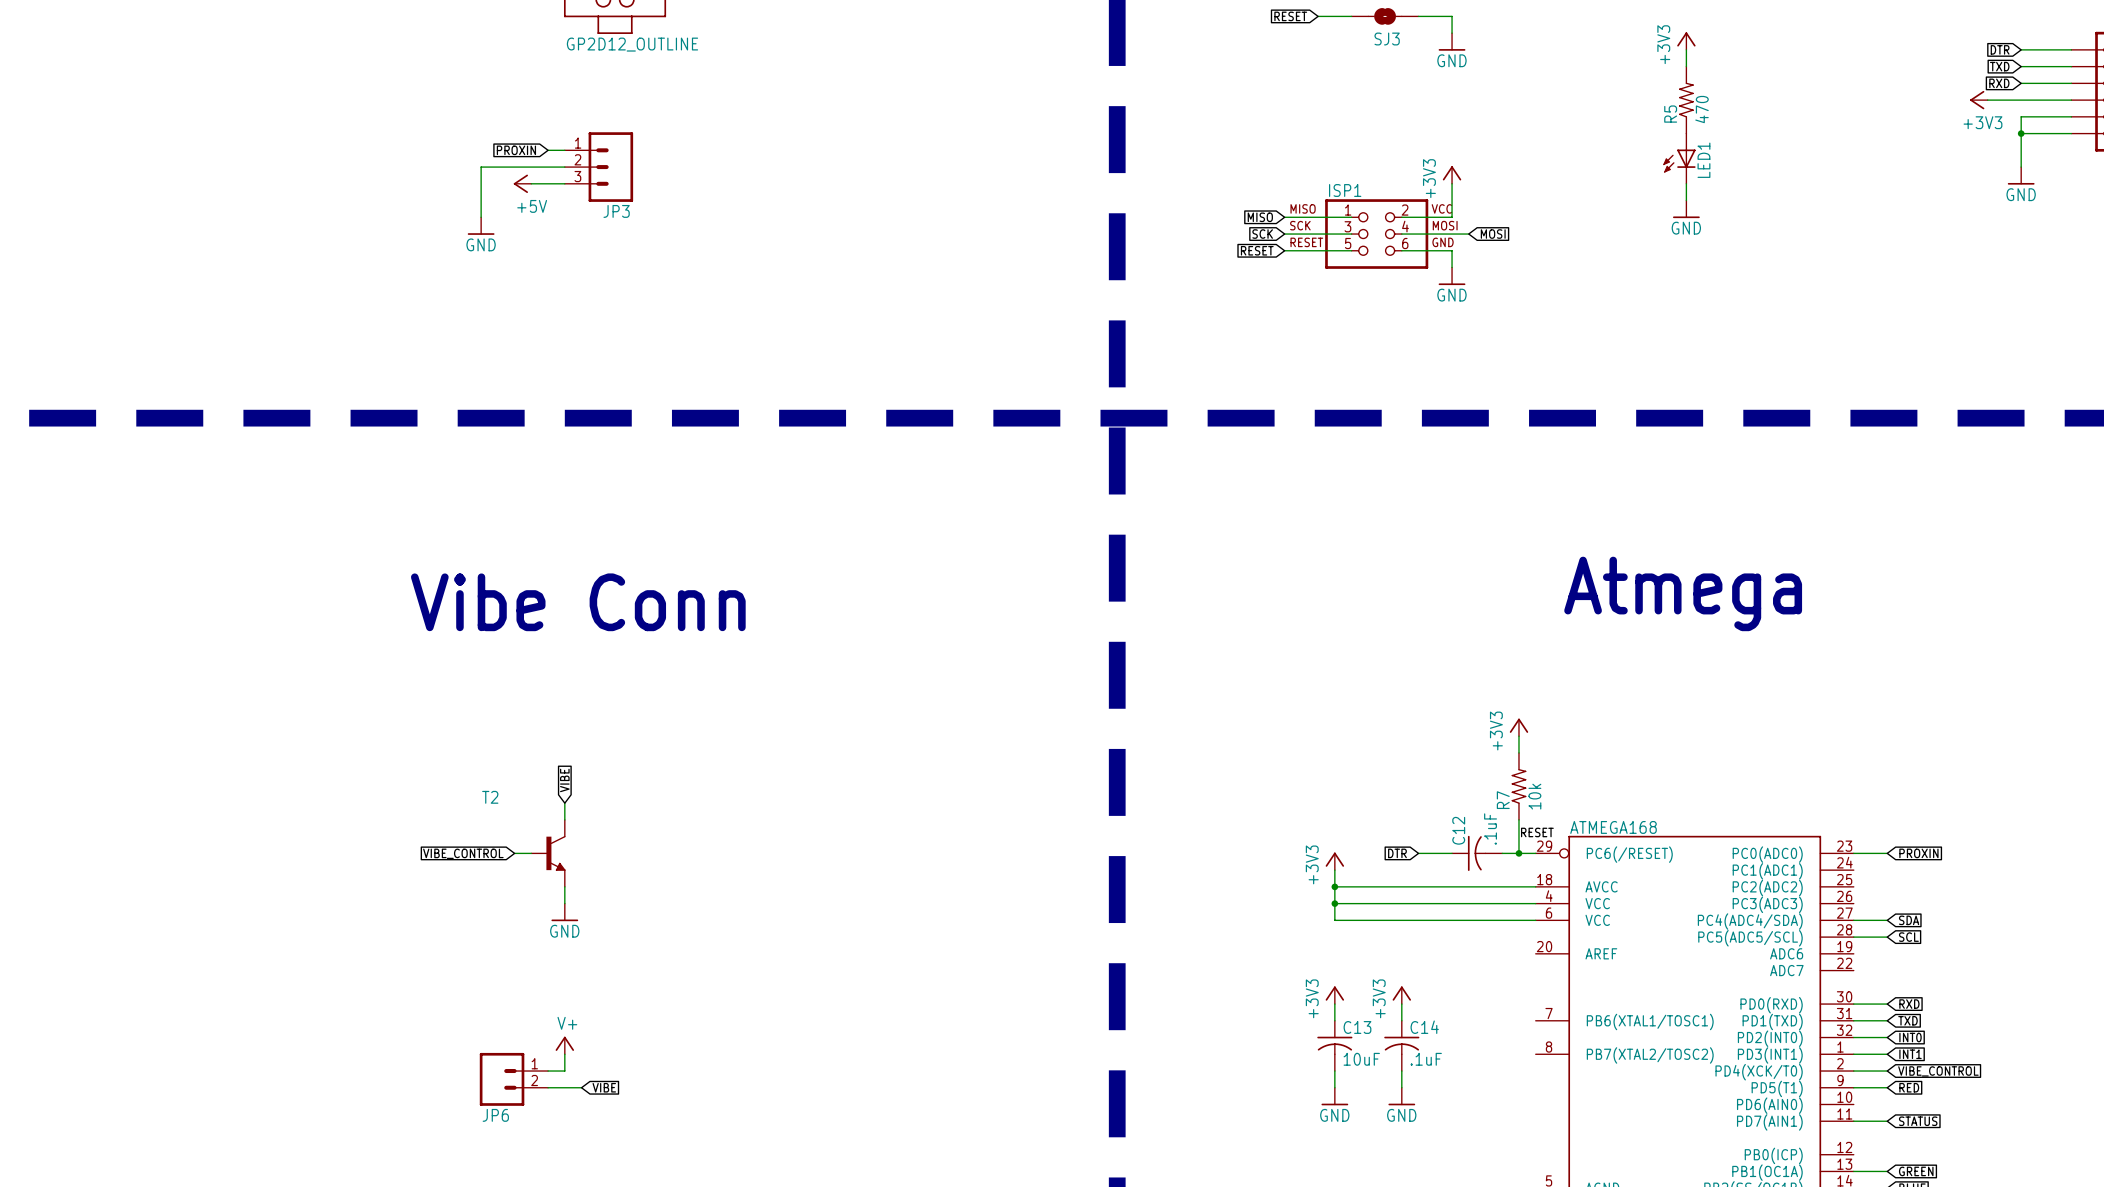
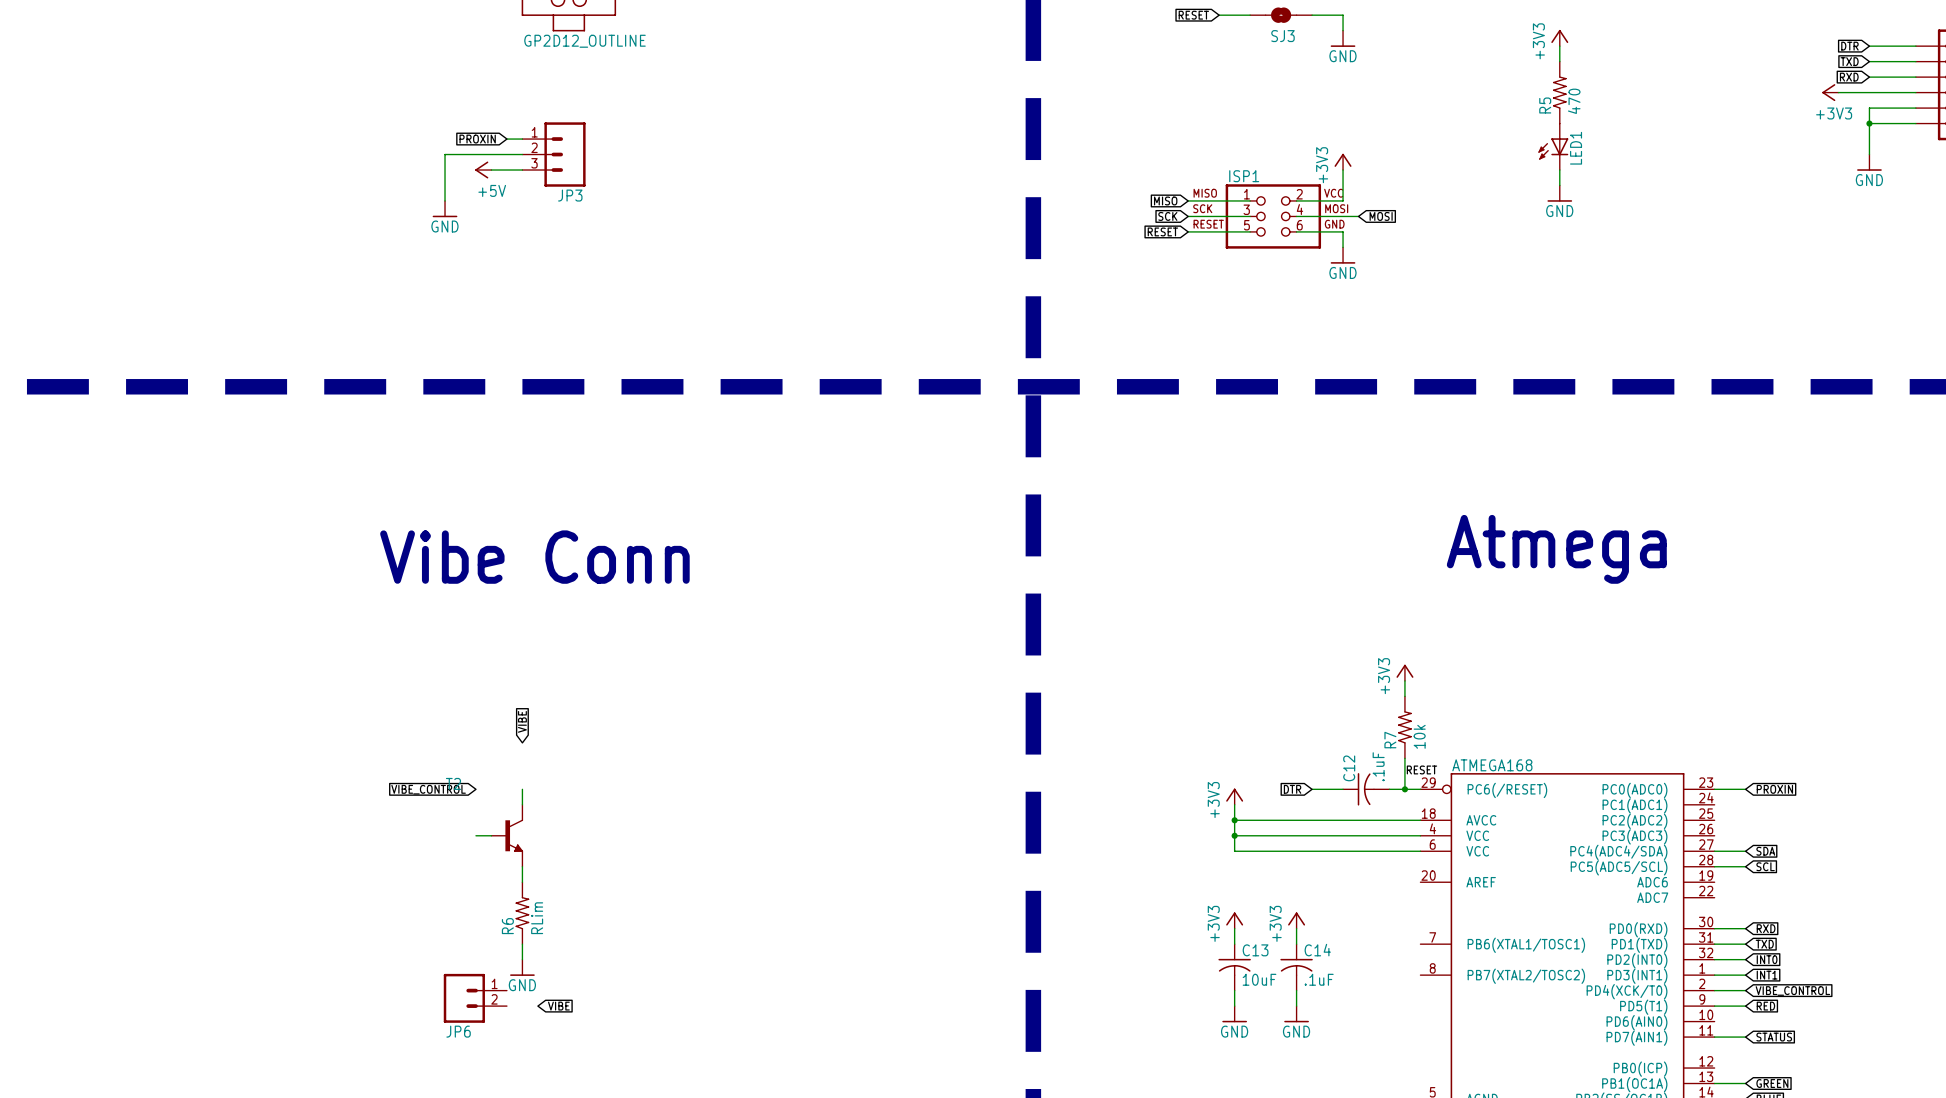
wire: (564, 803) (564, 819) -> (522, 789) (522, 804)
wire: (514, 853) (531, 853) -> (475, 835) (491, 835)
T2 position: (548, 853) -> (507, 835)
wire: (564, 886) (564, 903) -> (522, 866) (522, 882)
power symbol: GND (564, 912) -> none
R6: none -> RLim (522, 913)
wire: none -> (522, 944) (522, 959)
power symbol: V+ (564, 1045) -> GND (522, 967)
wire: (564, 1054) (564, 1071) (548, 1071) -> none
wire: (548, 1087) (581, 1087) -> none

